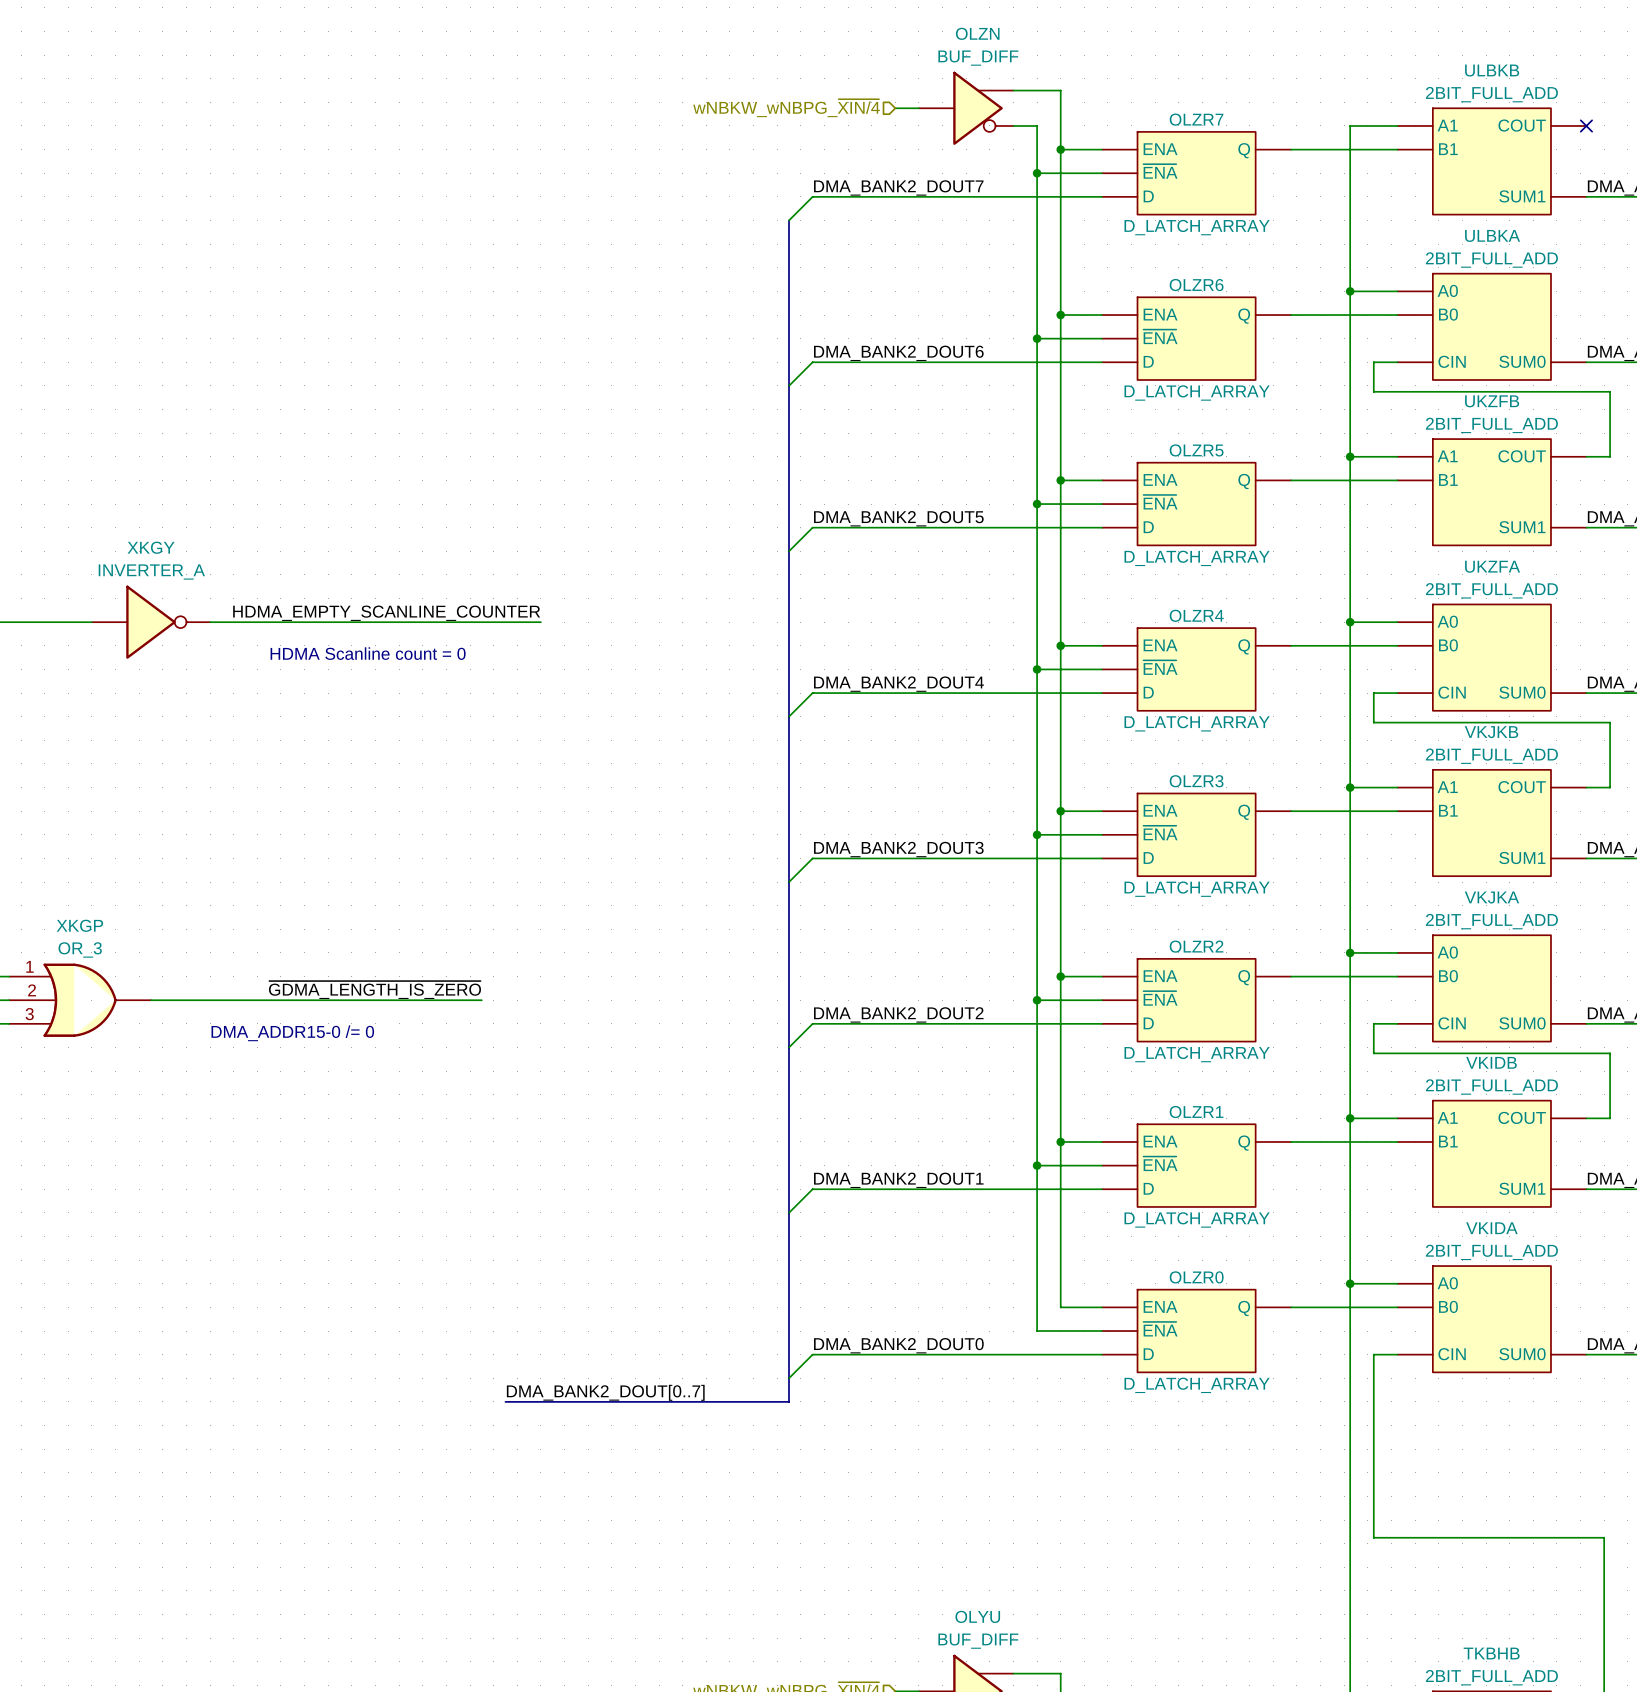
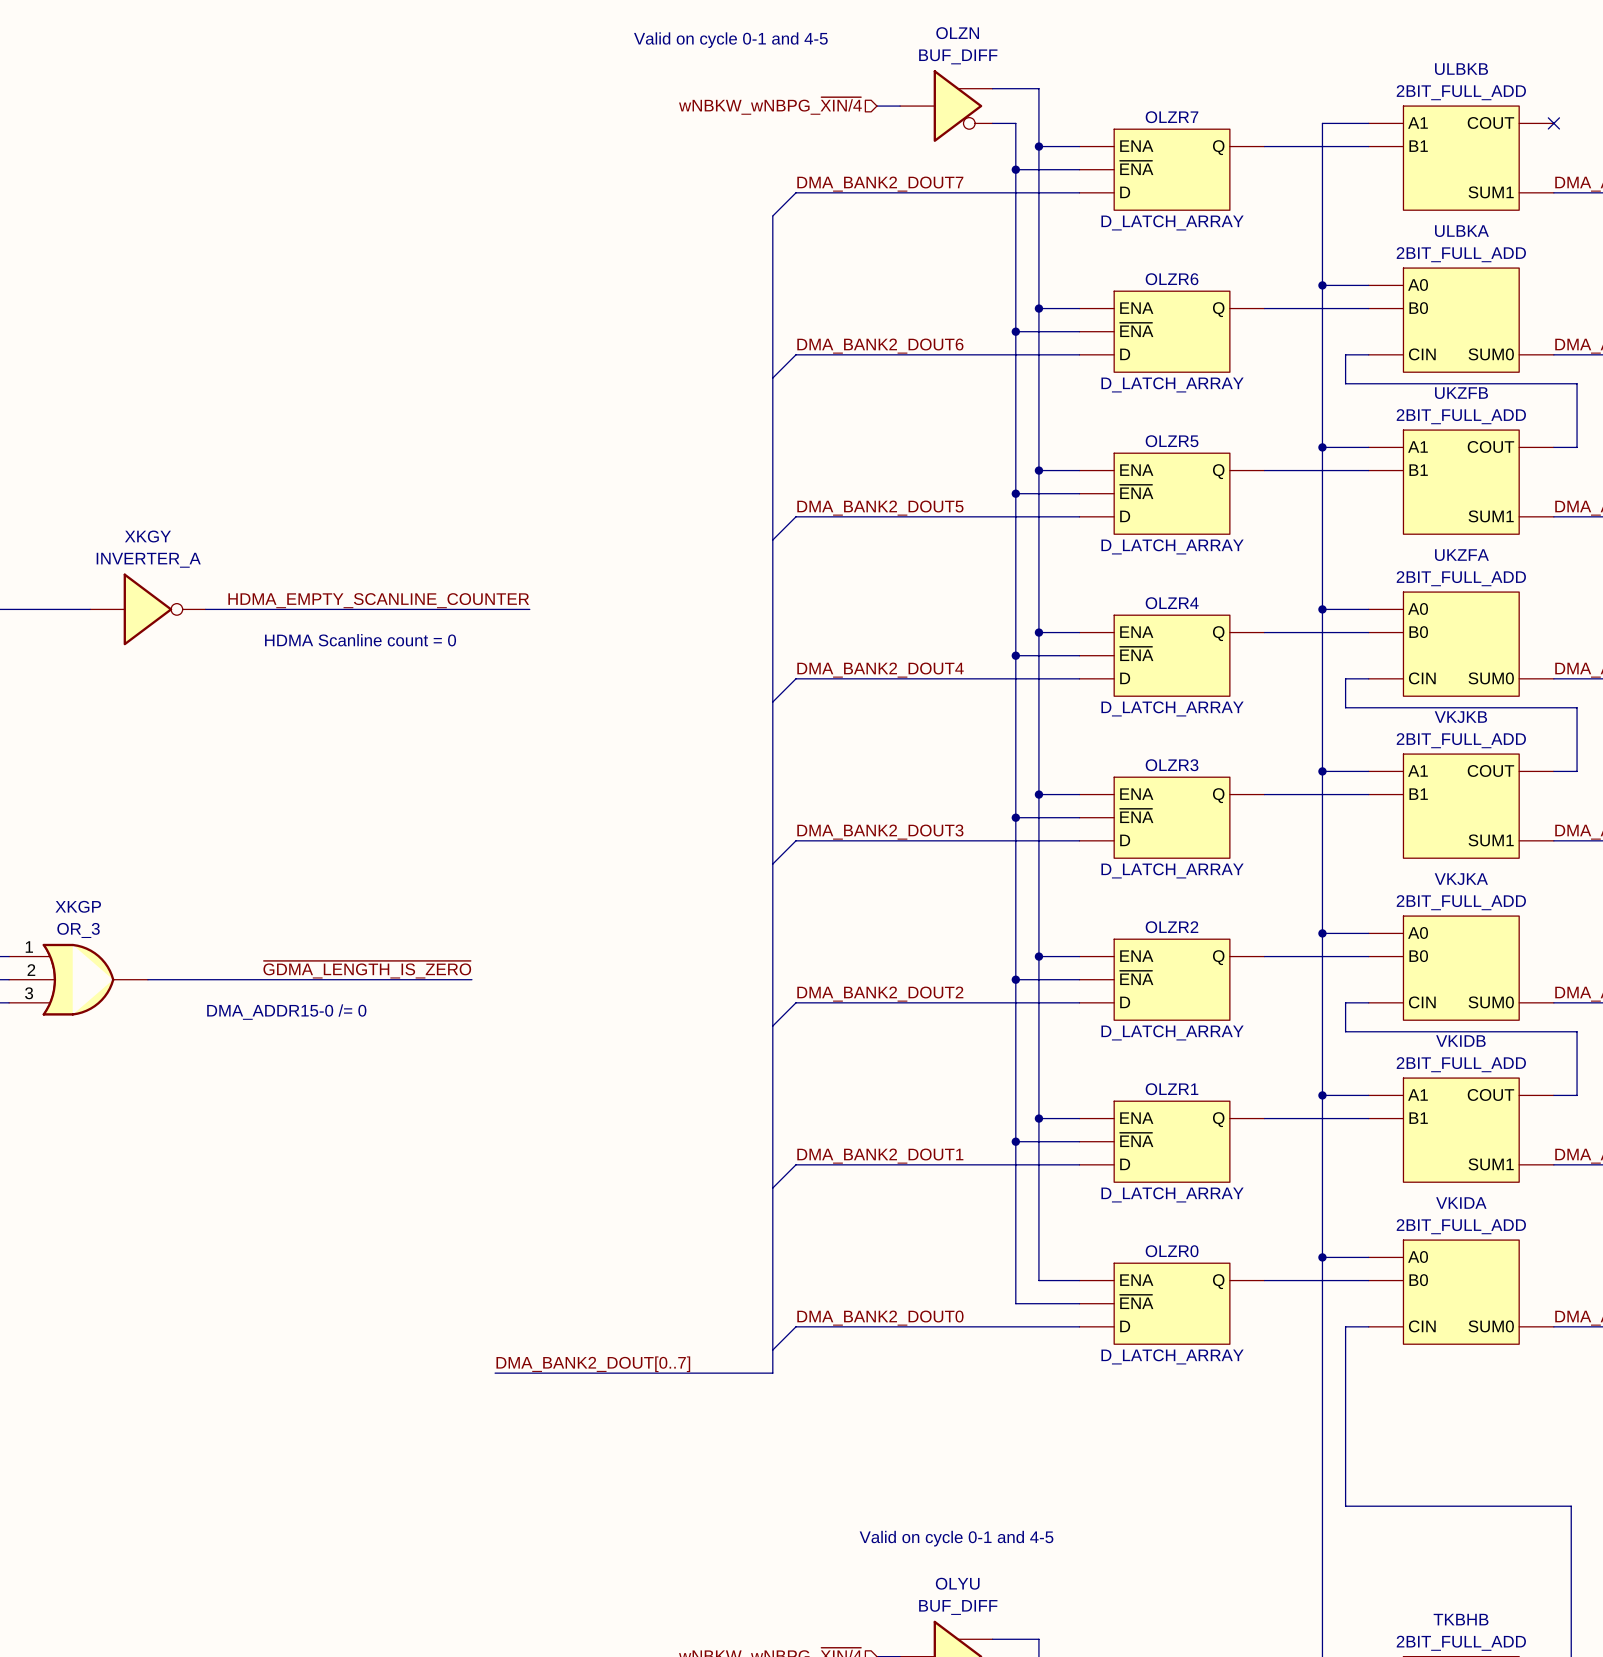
text: none -> Valid on cycle 0-1 and 4-5 (730, 40)
text: none -> Valid on cycle 0-1 and 4-5 (956, 1538)

